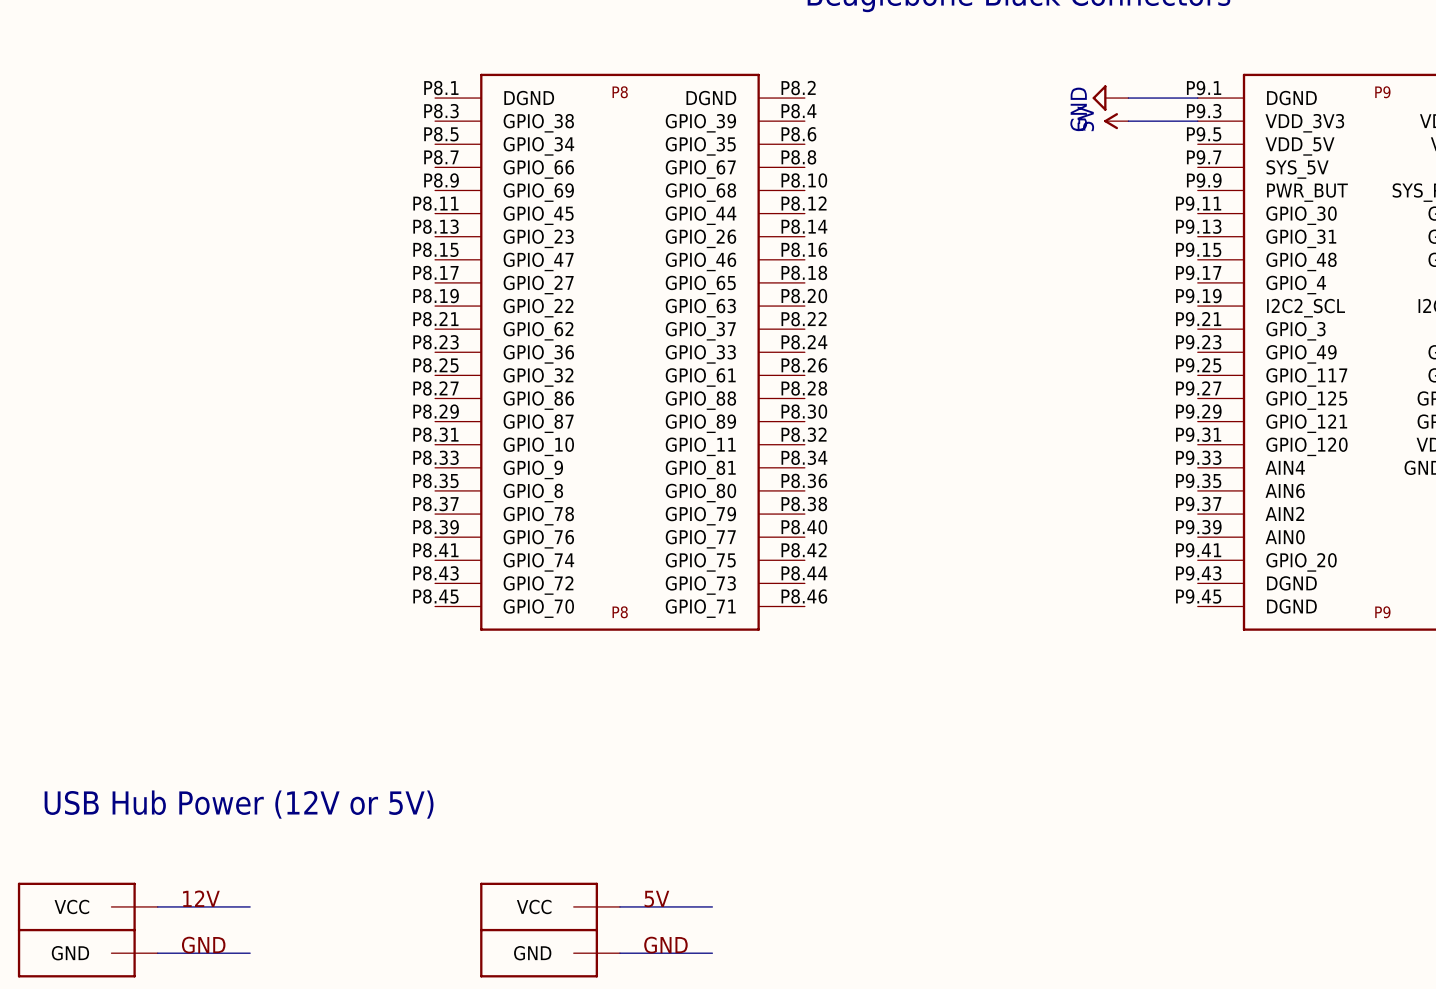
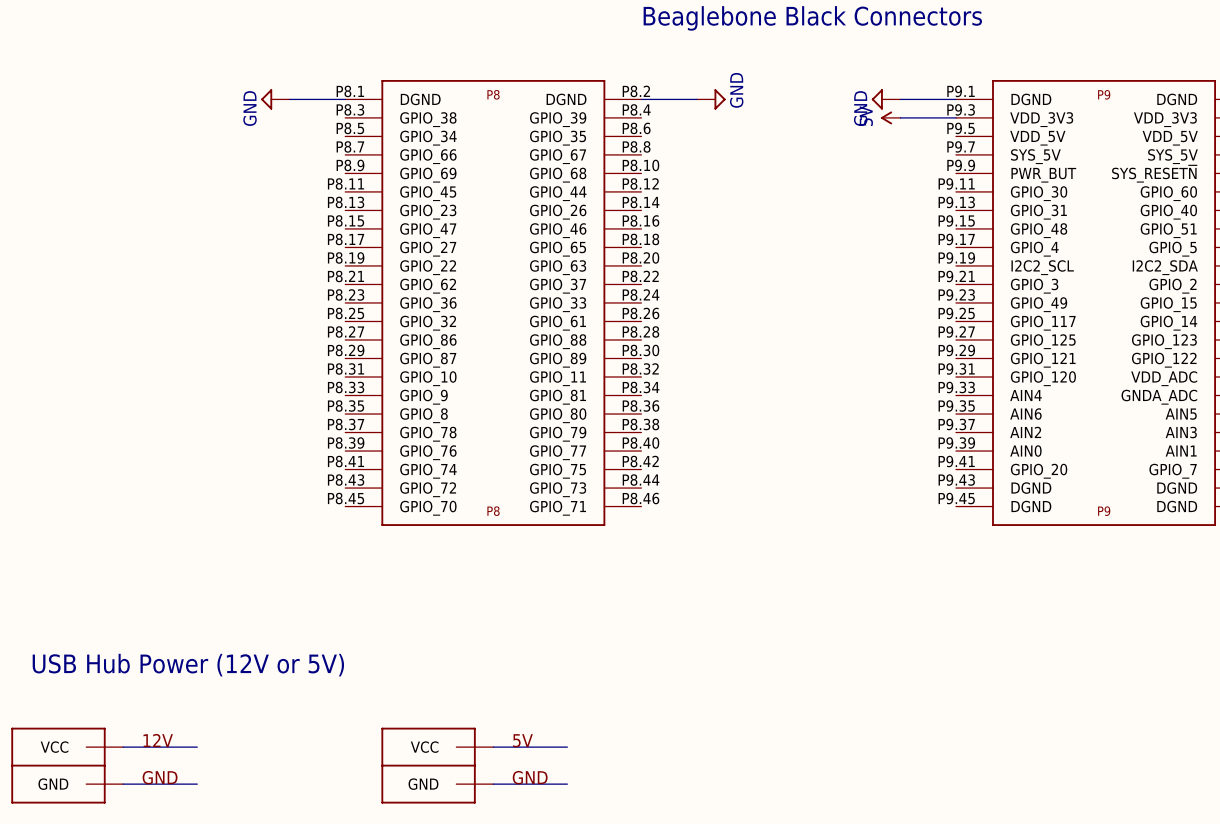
power symbol: none -> GND (275, 99)
wire: none -> (289, 99) (345, 99)
wire: none -> (641, 99) (696, 99)
power symbol: none -> GND (711, 99)

